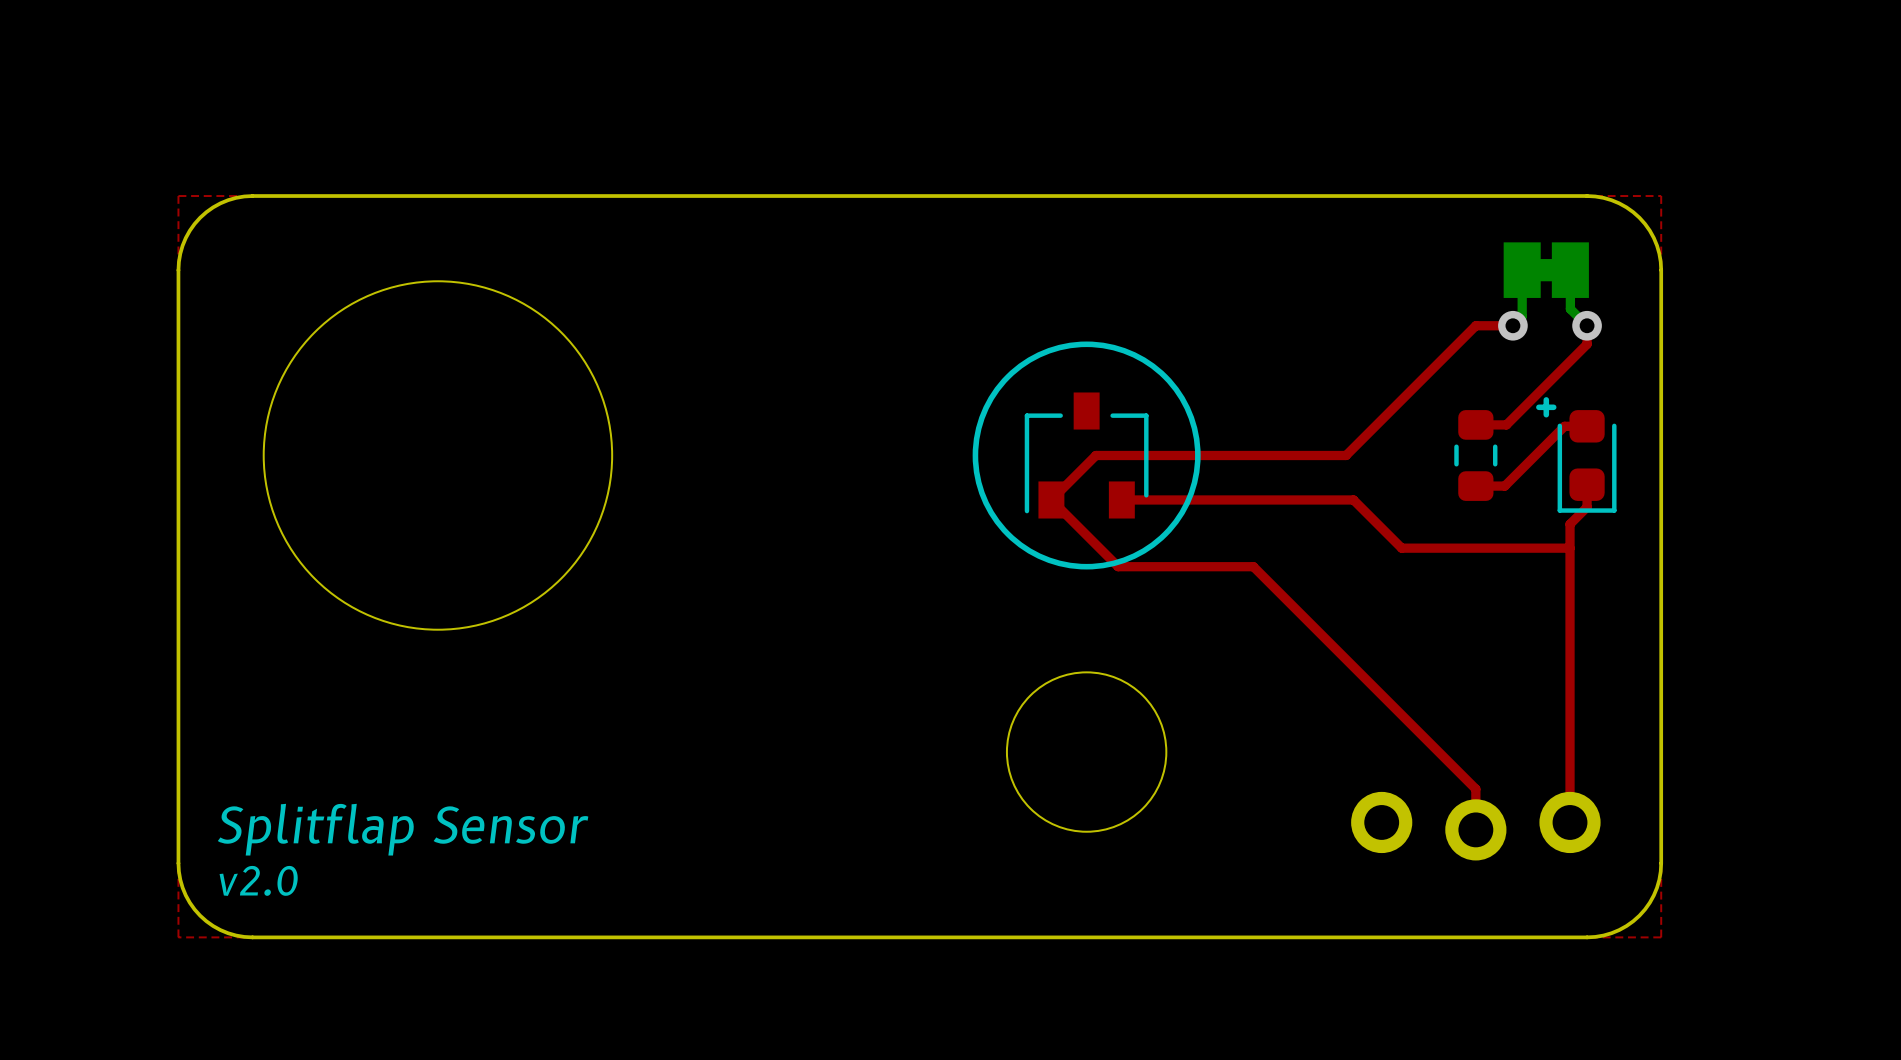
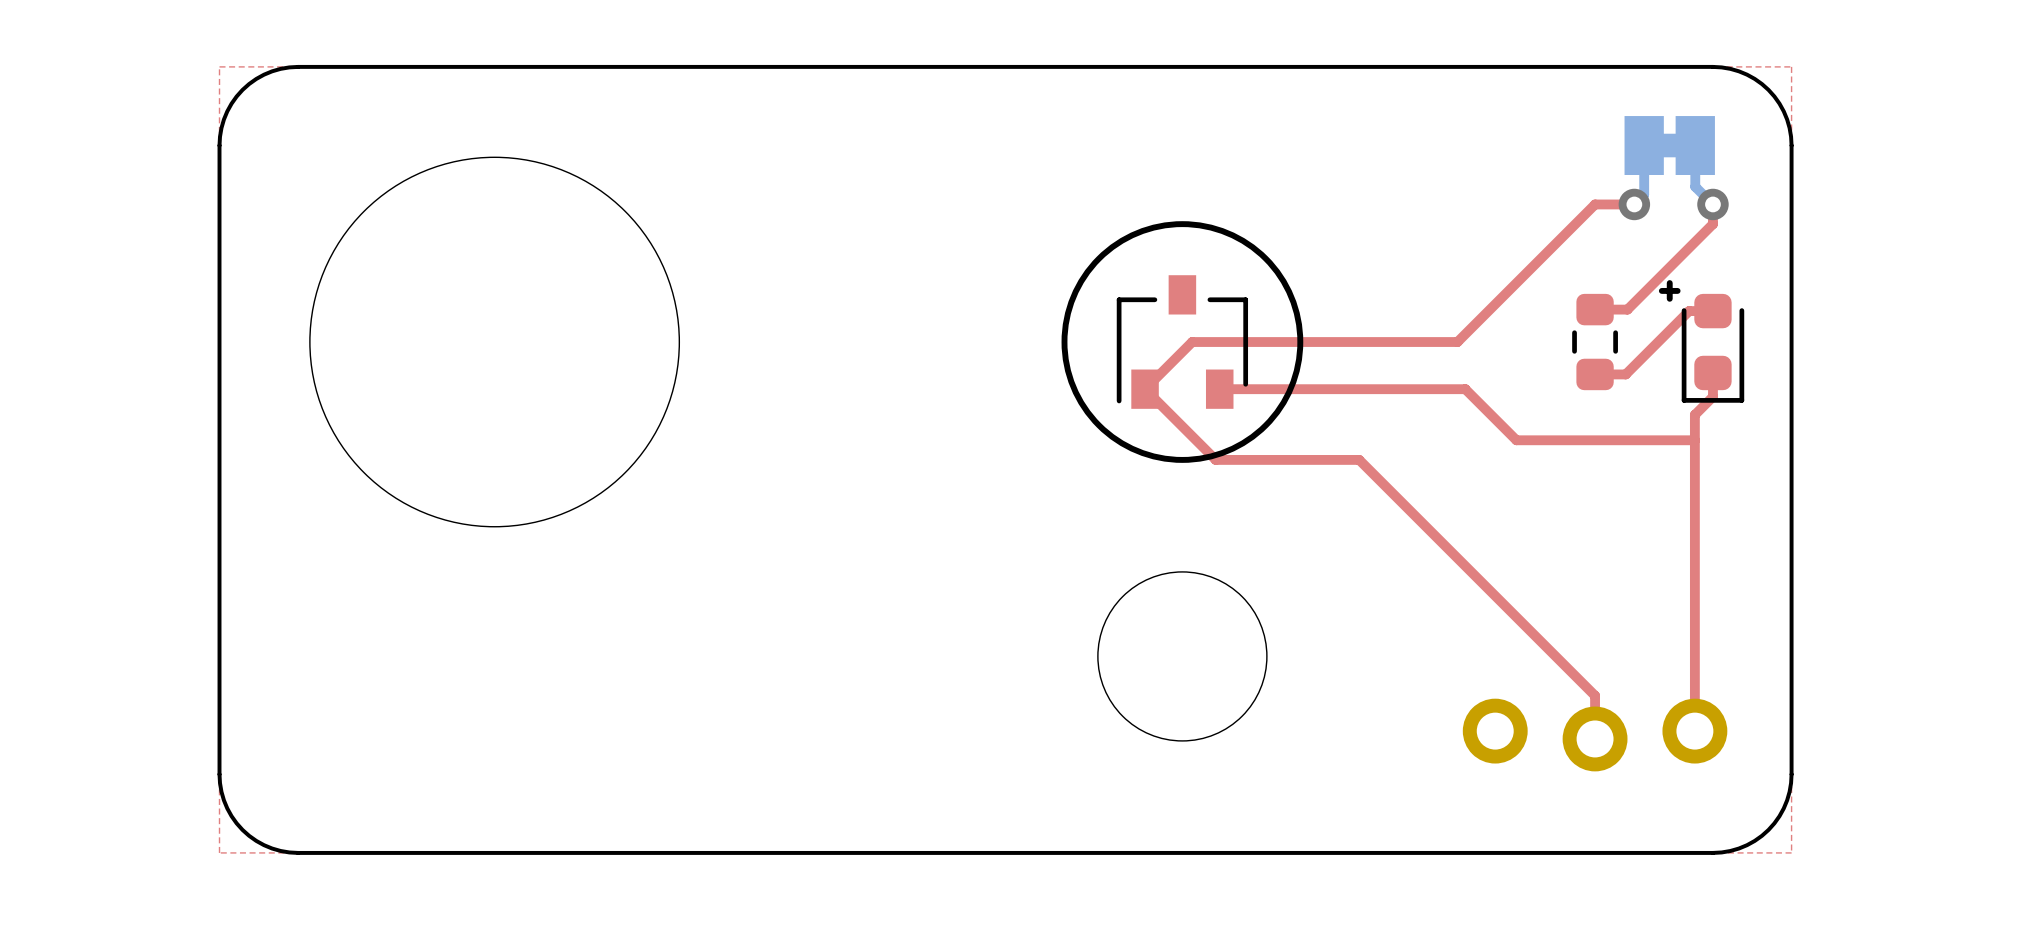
text: Splitflap Sensor (403, 829) -> none
text: v2.0 (258, 880) -> none

